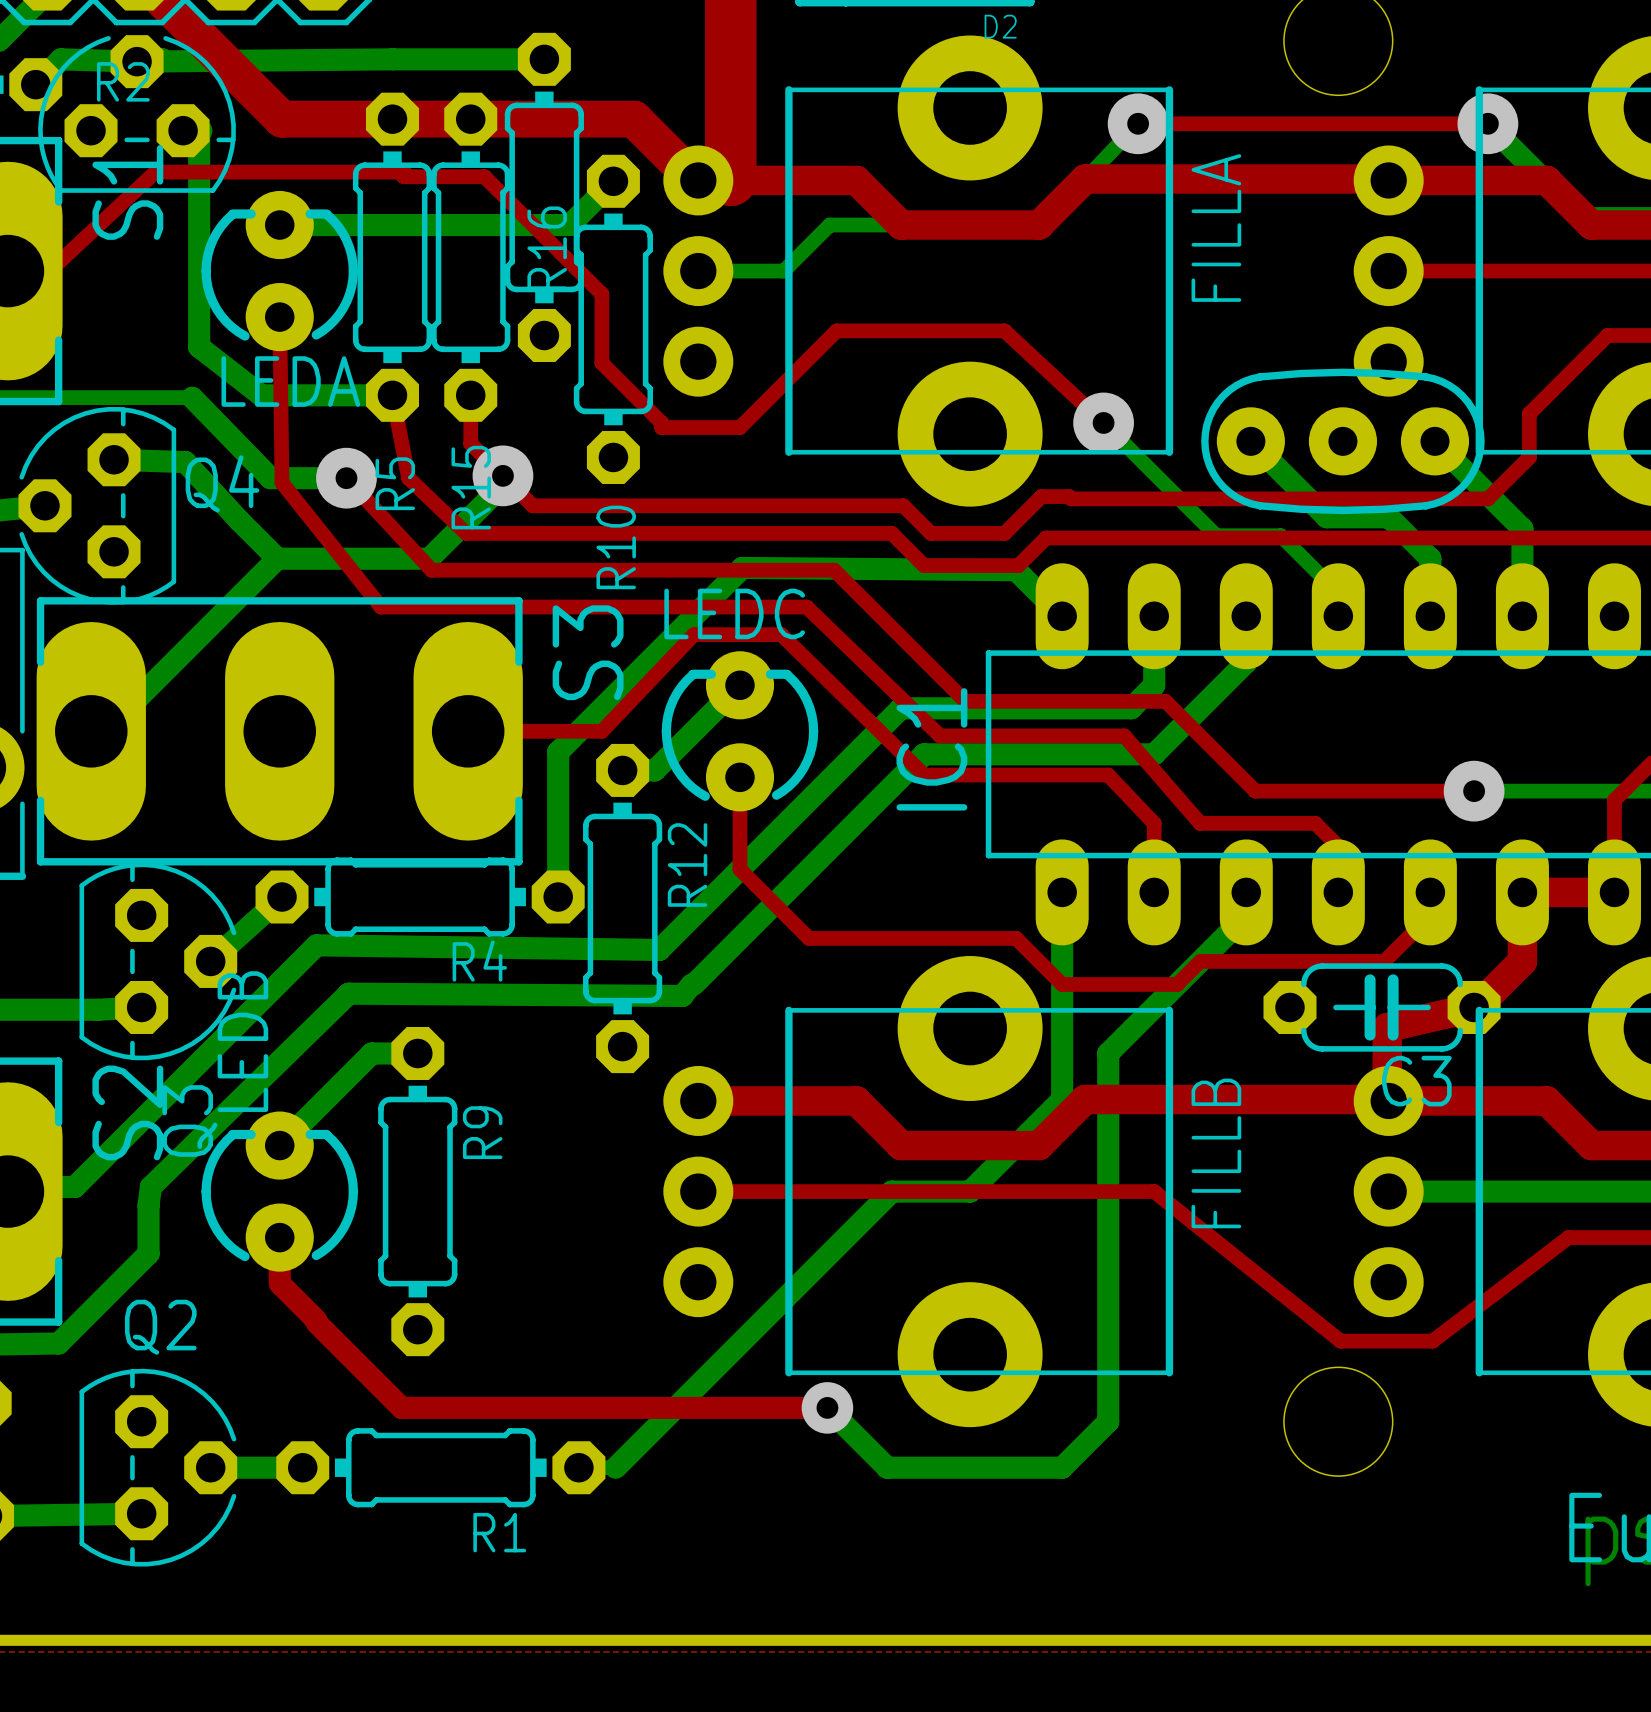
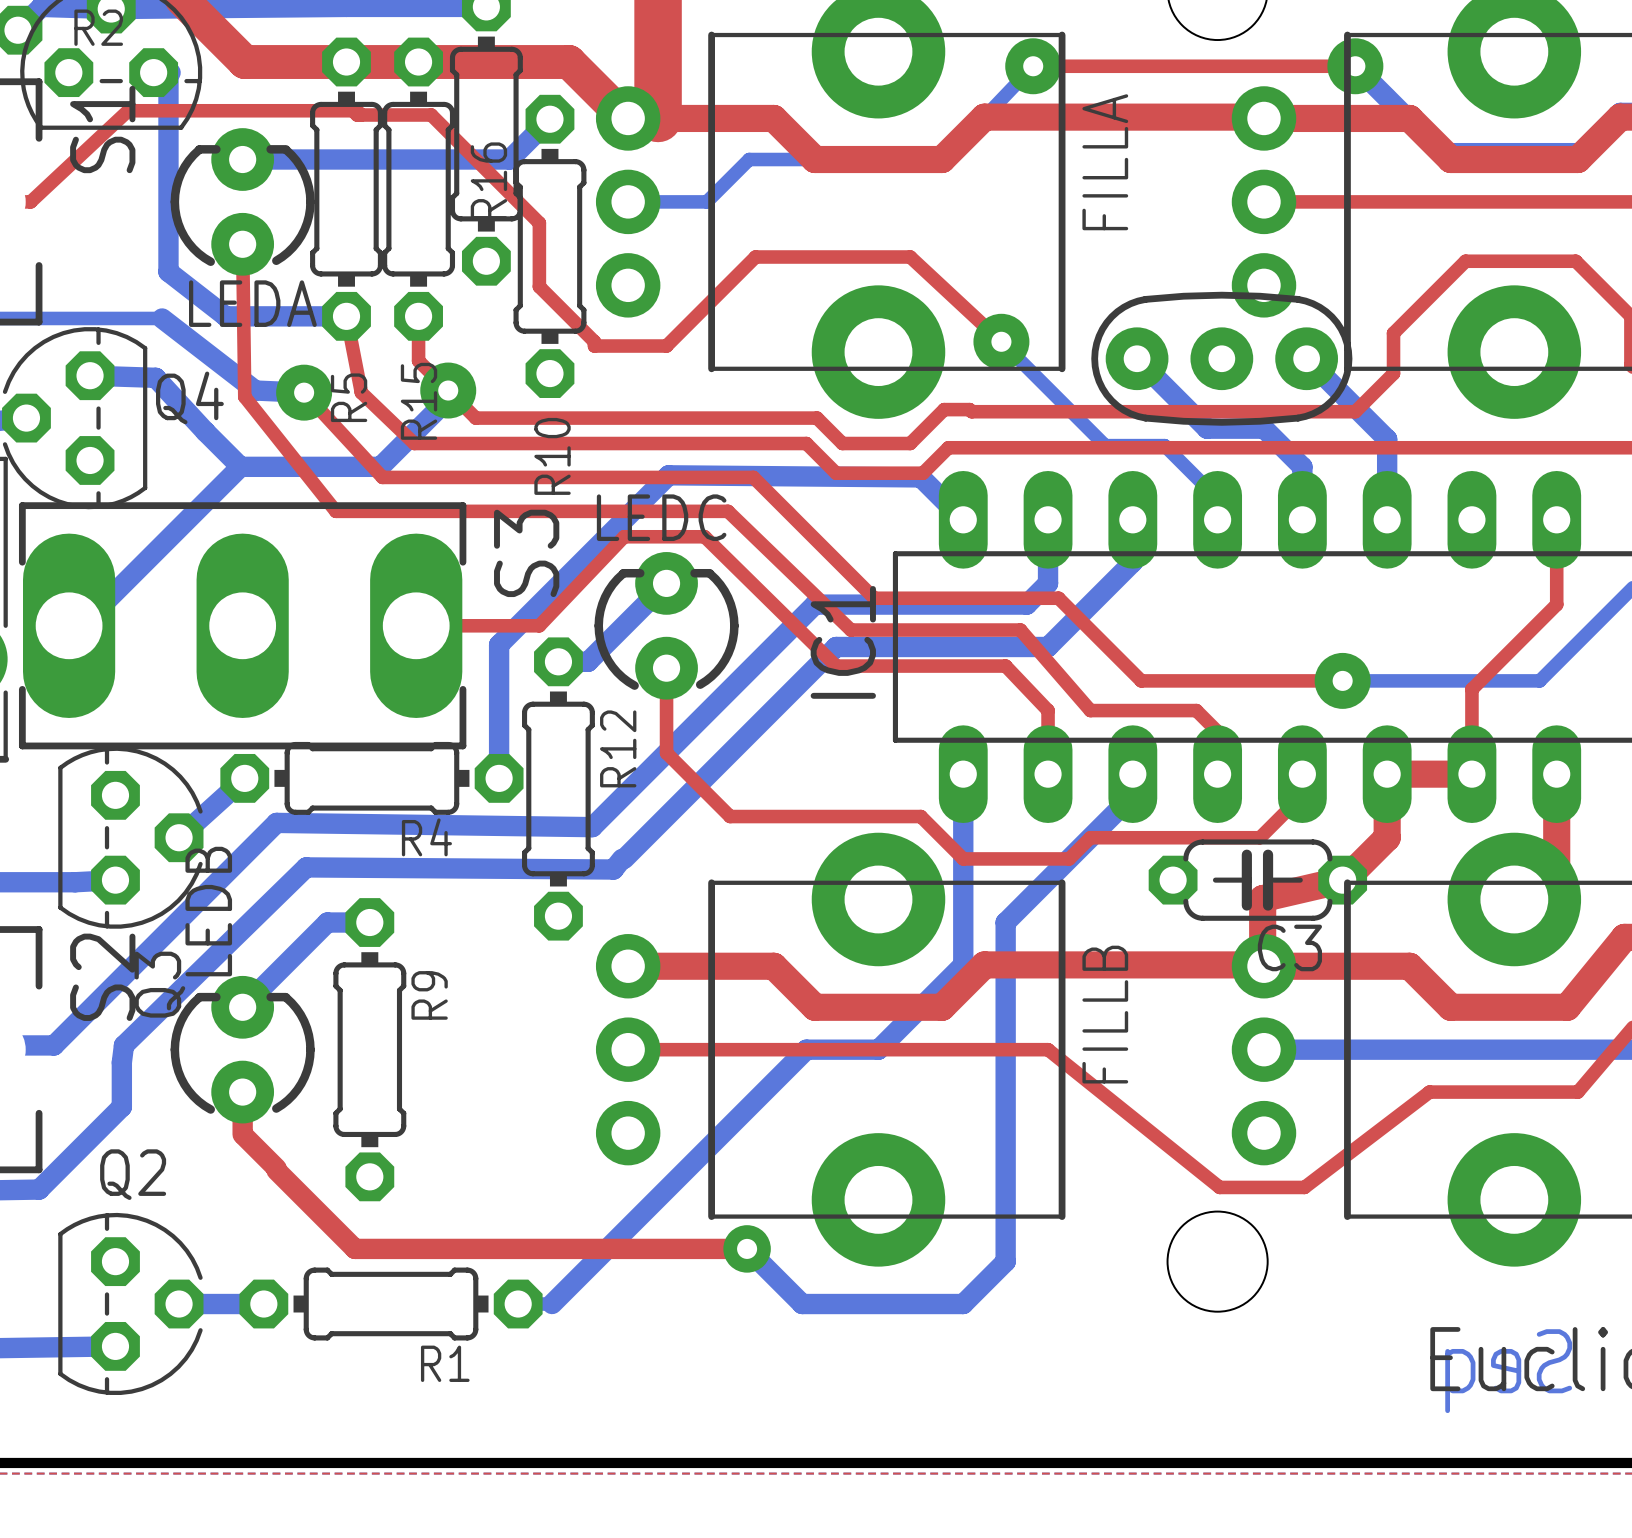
bottom track: (192, 397) (270, 478) (346, 478) -> (162, 318) (255, 390) (304, 392)
S3 footprint: [36, 597, 523, 866] -> [18, 502, 467, 750]

